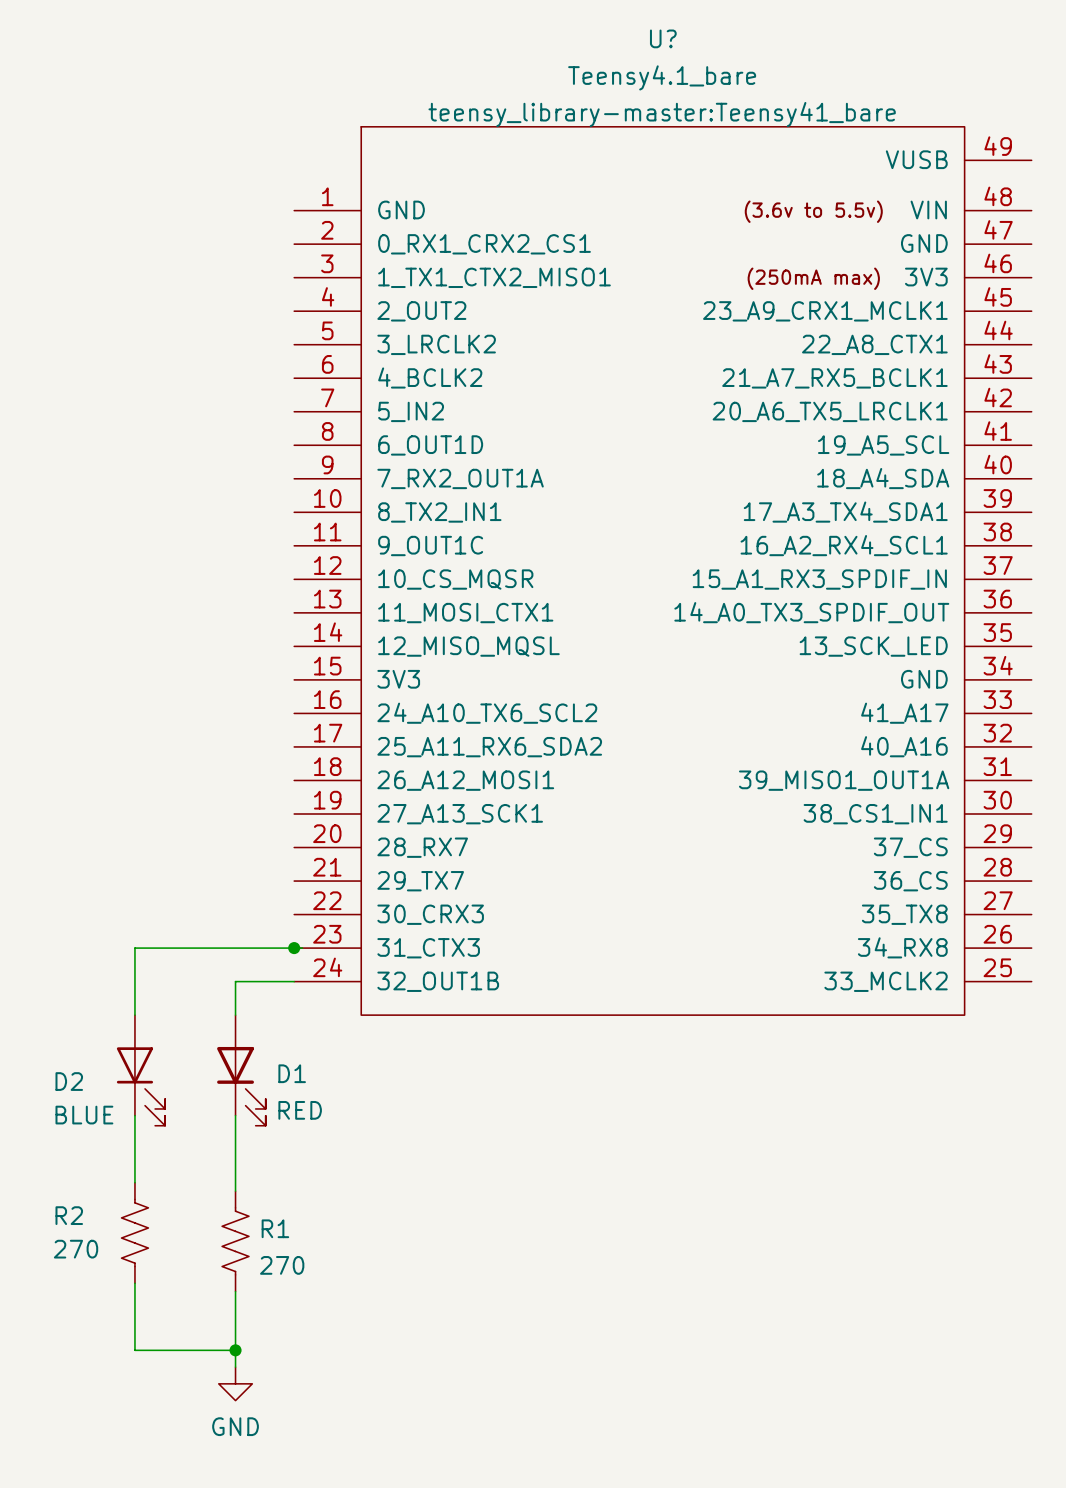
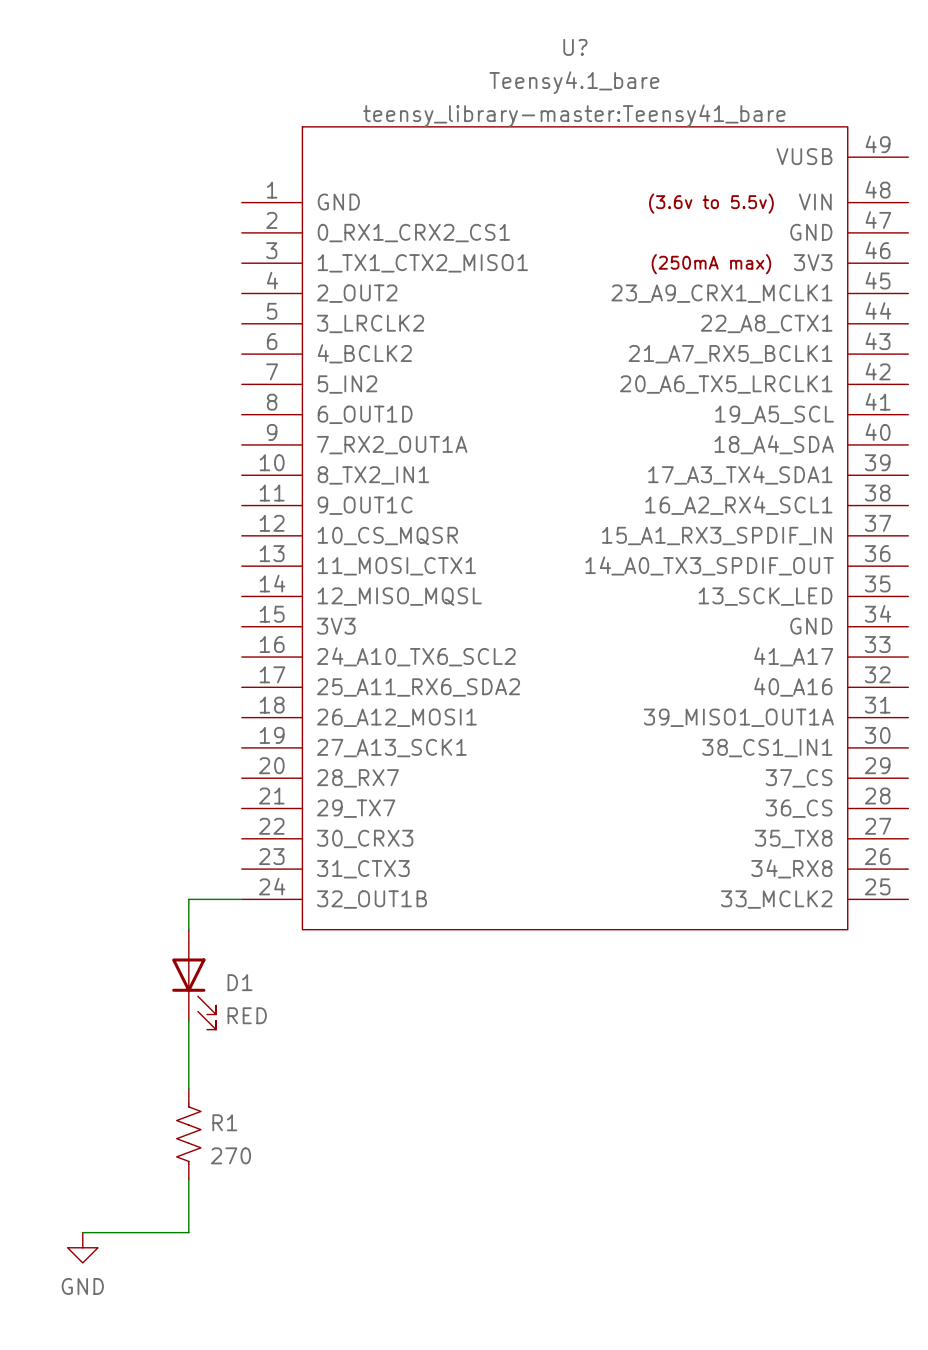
junction: (294, 948) -> none
wire: (302, 948) (134, 948) (134, 1015) -> none
D2: BLUE (141, 1070) -> none
wire: (134, 1115) (134, 1182) -> none
R2: 270 (134, 1233) -> none
wire: (134, 1283) (134, 1350) -> (82, 1232) (97, 1232)
wire: (235, 1350) (235, 1367) -> none
junction: (235, 1350) -> none
power symbol position: GND (235, 1383) -> GND (82, 1247)

